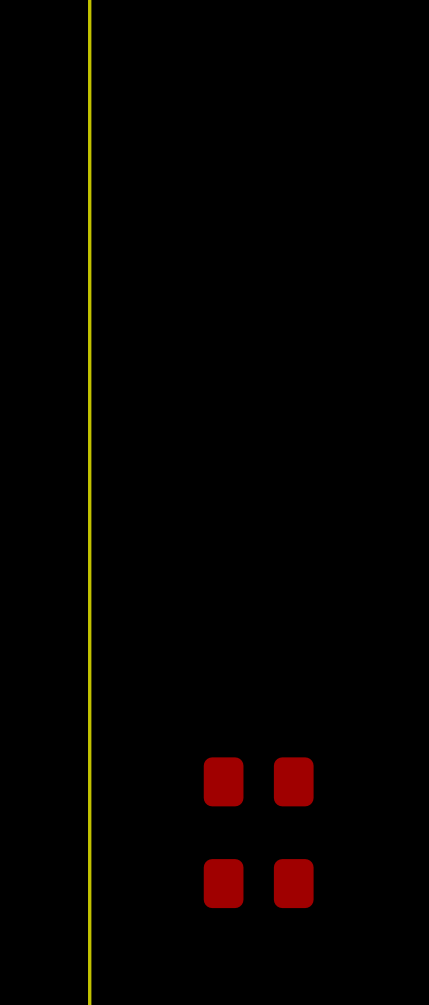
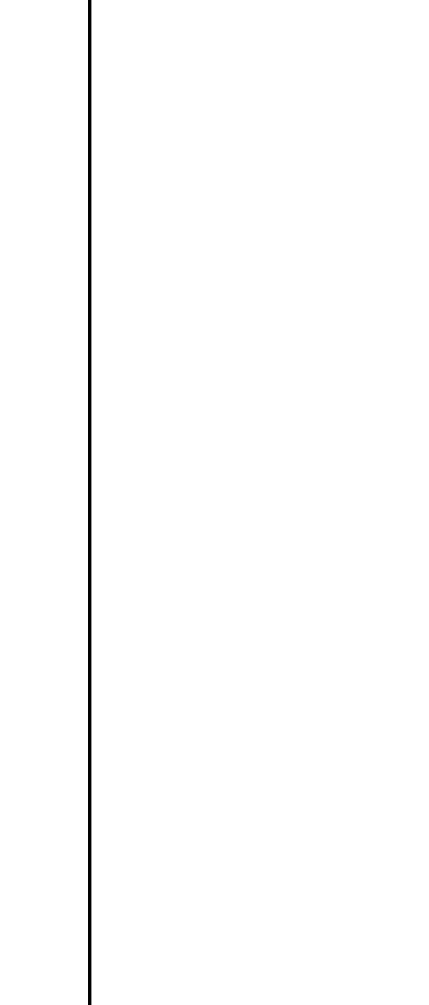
part: (258, 781) -> none
part: (258, 883) -> none

